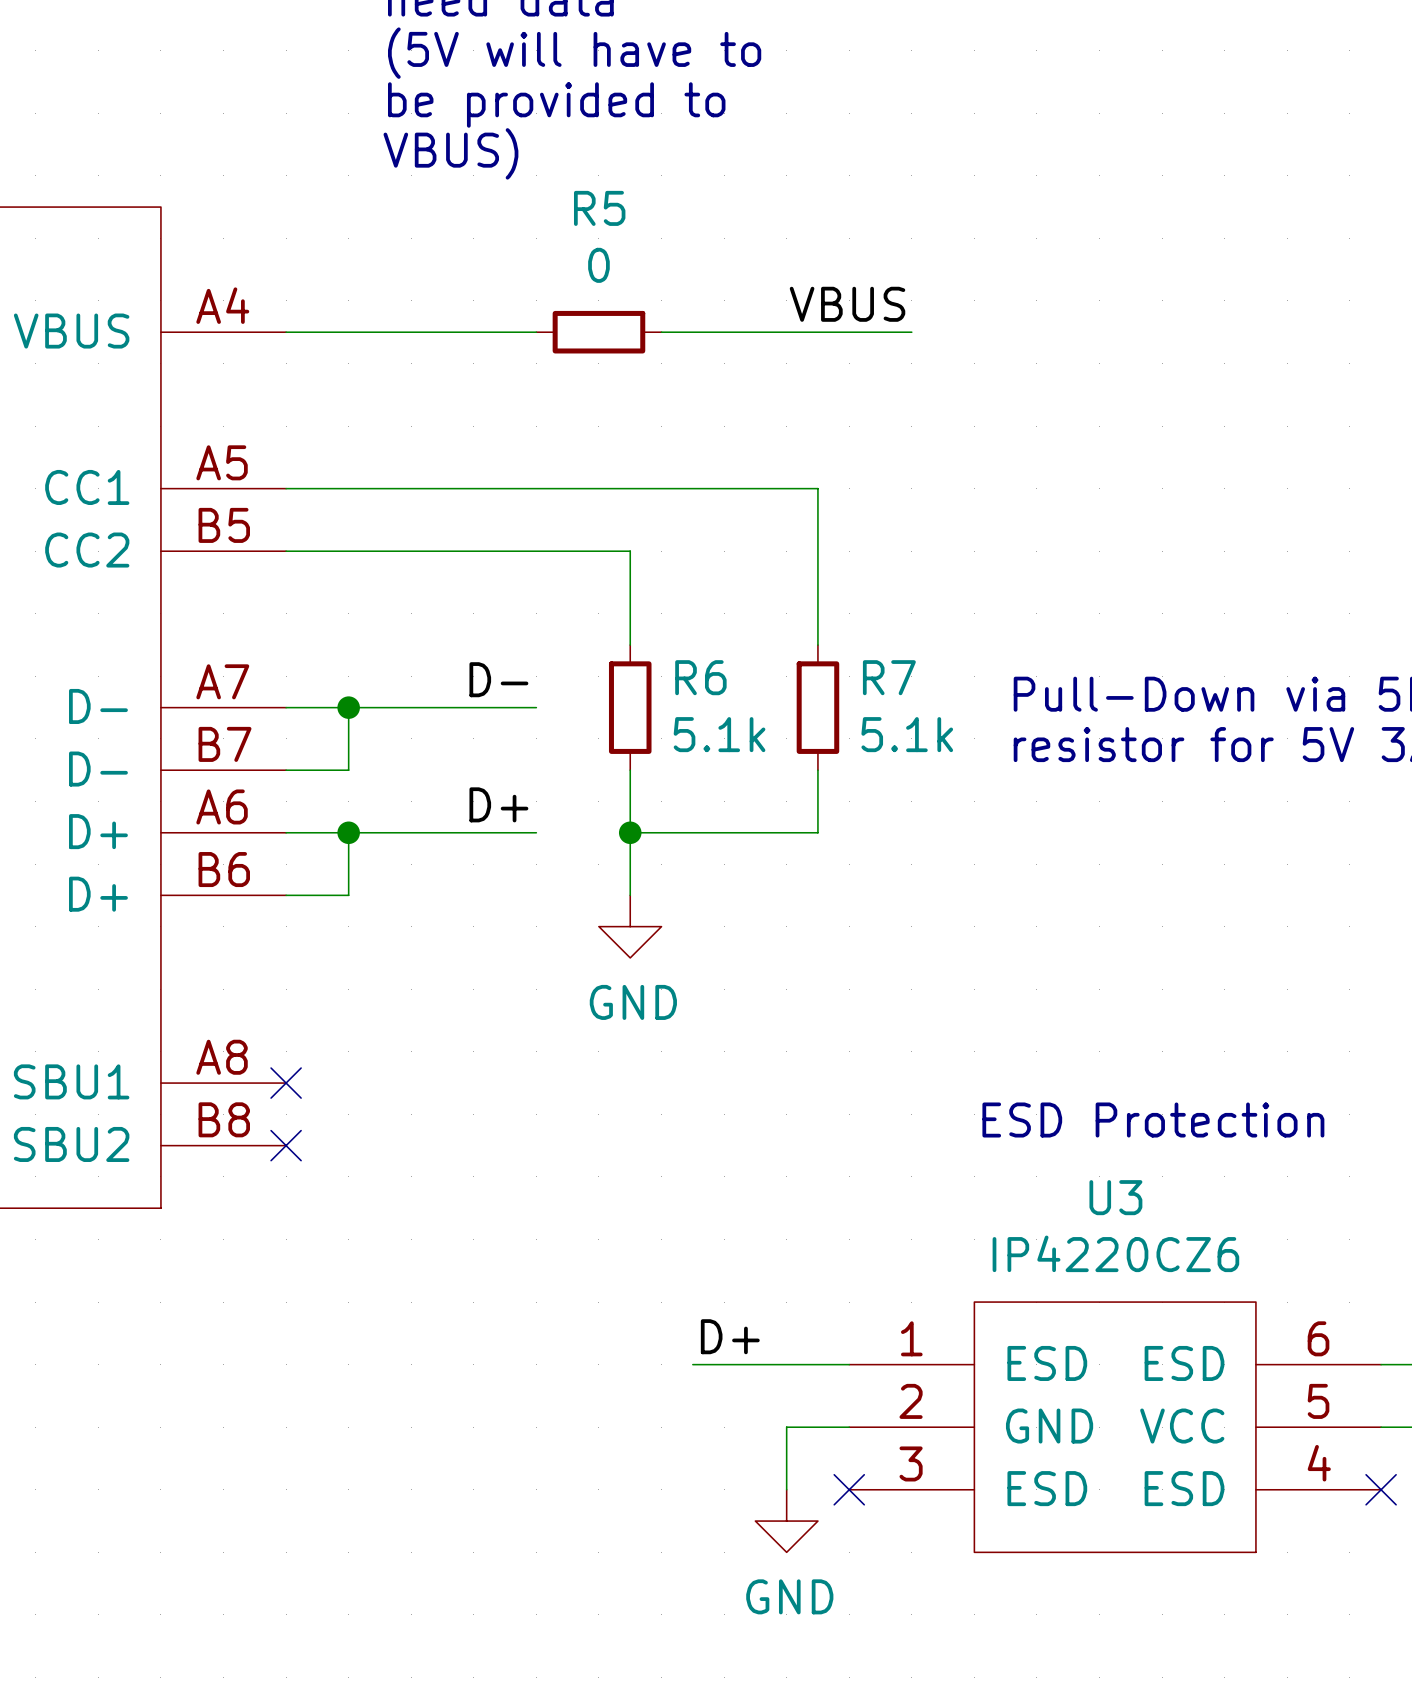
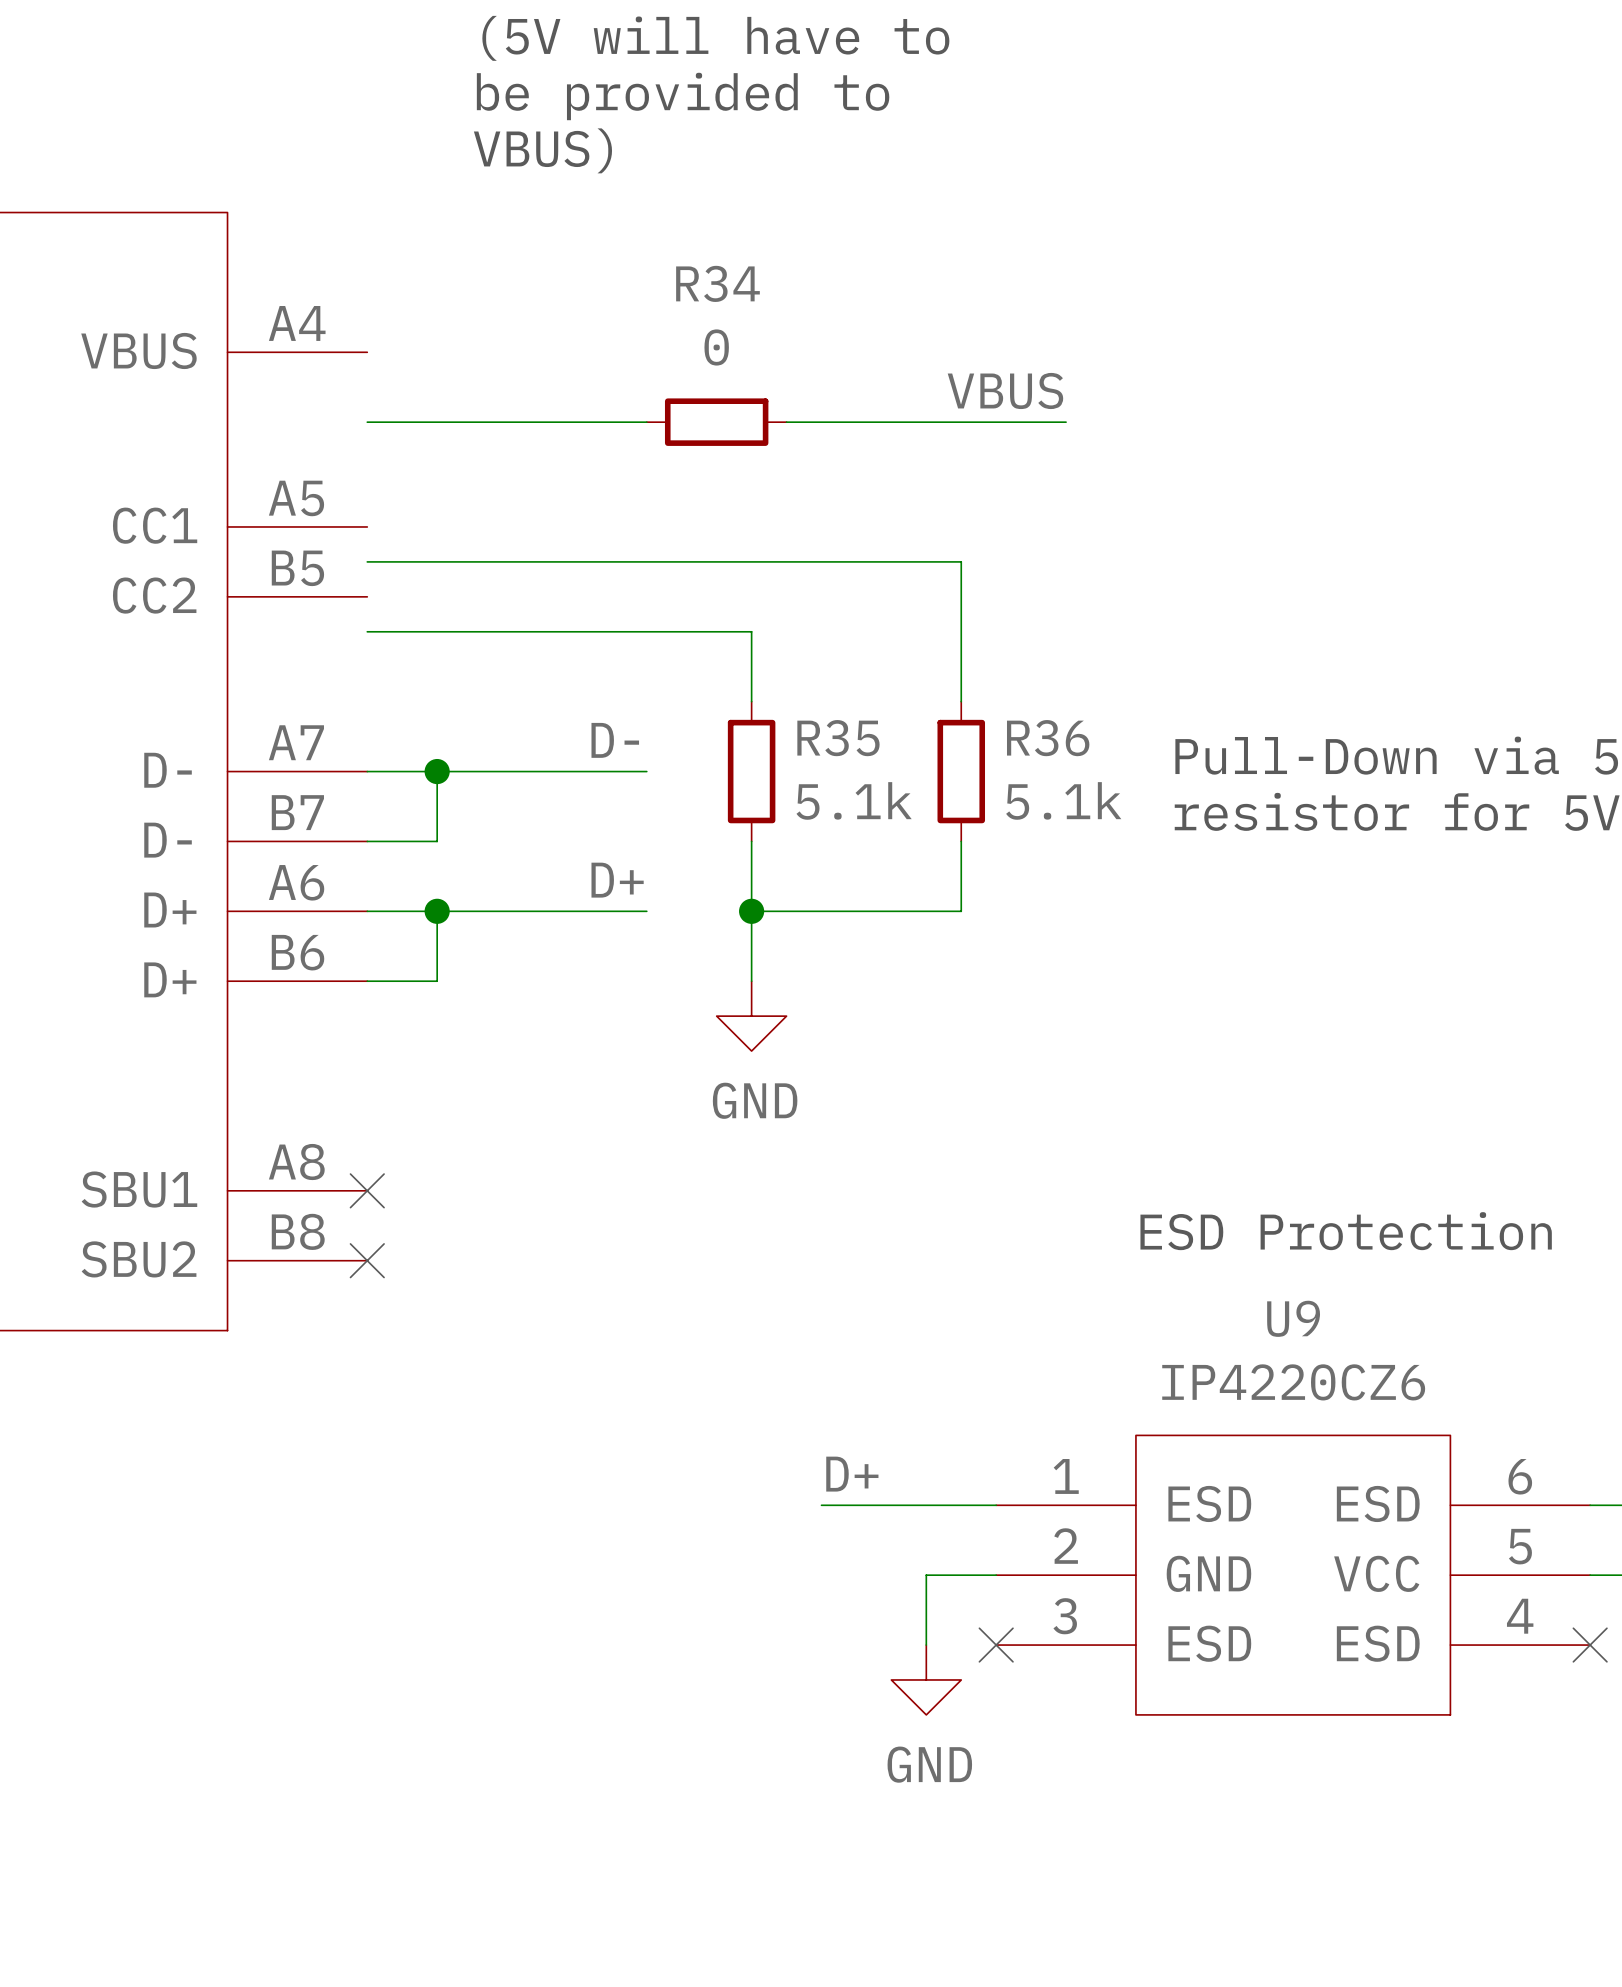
label position: VBUS (847, 304) -> VBUS (1005, 390)
wire: (286, 332) (536, 332) -> (367, 422) (646, 422)
R5: 0 (598, 332) -> none
wire: (661, 332) (911, 332) -> (786, 422) (1066, 422)
R34: none -> 0 (716, 422)
wire: (286, 488) (817, 488) (817, 519) -> (367, 561) (961, 561)
wire: (286, 551) (630, 551) (630, 582) -> (367, 631) (751, 631)
R6 name: R6 (700, 677) -> R35 (838, 738)
R7 name: R7 (889, 677) -> R36 (1048, 738)
U3 name: U3 (1115, 1197) -> U9 (1293, 1318)

